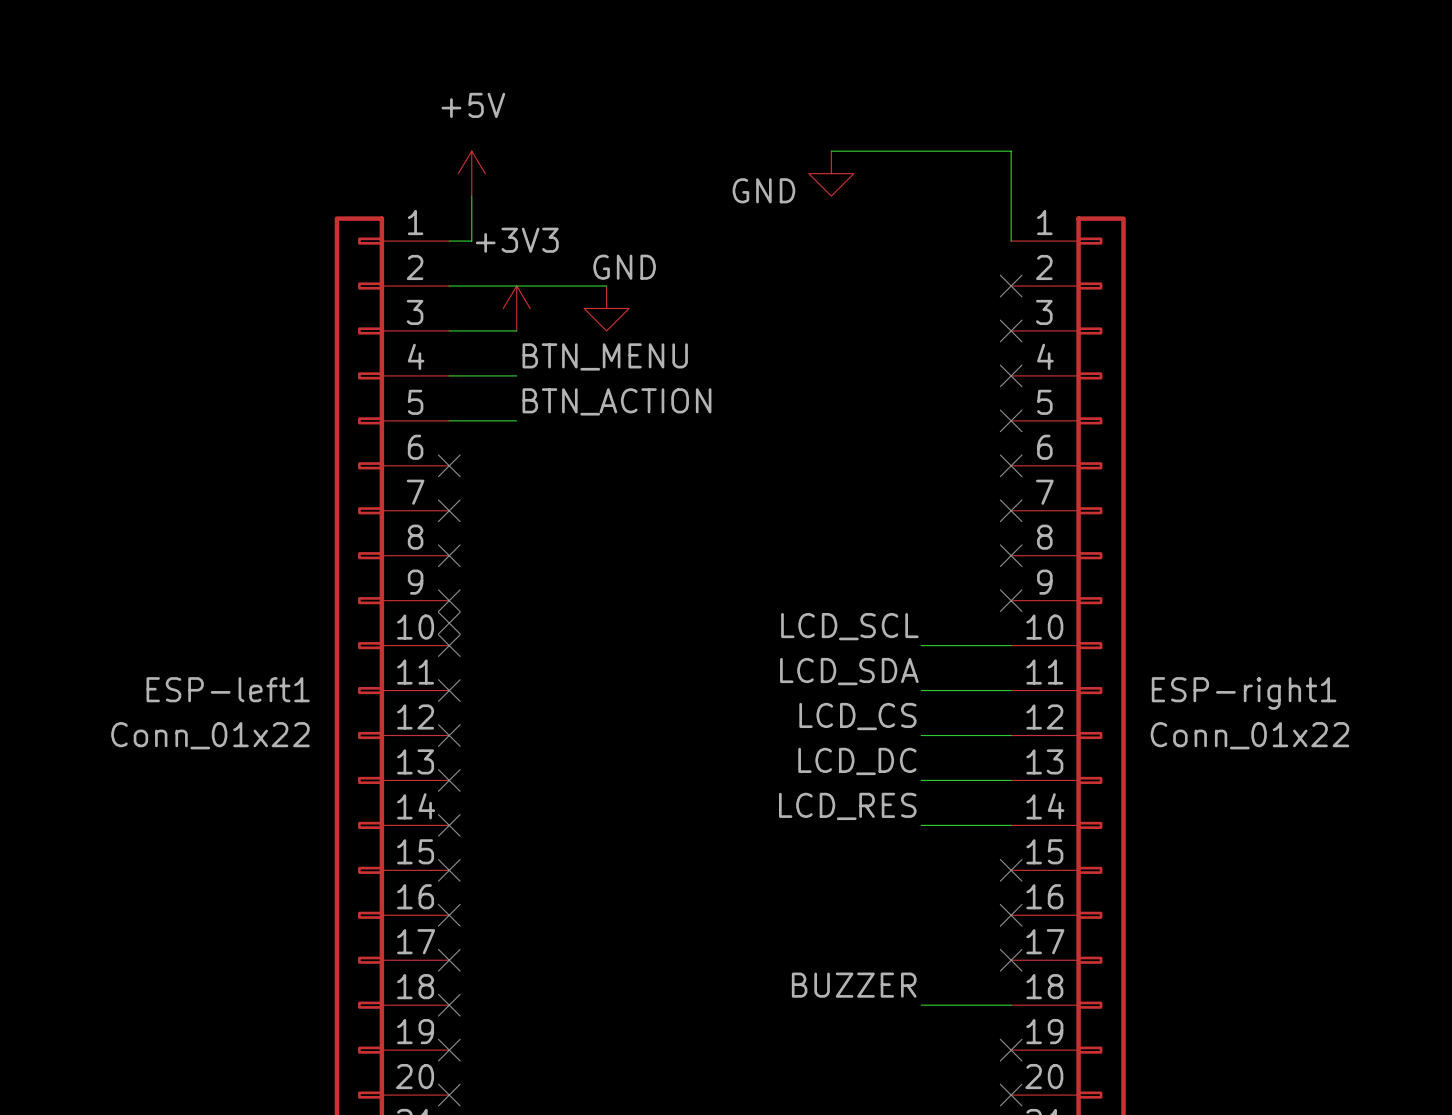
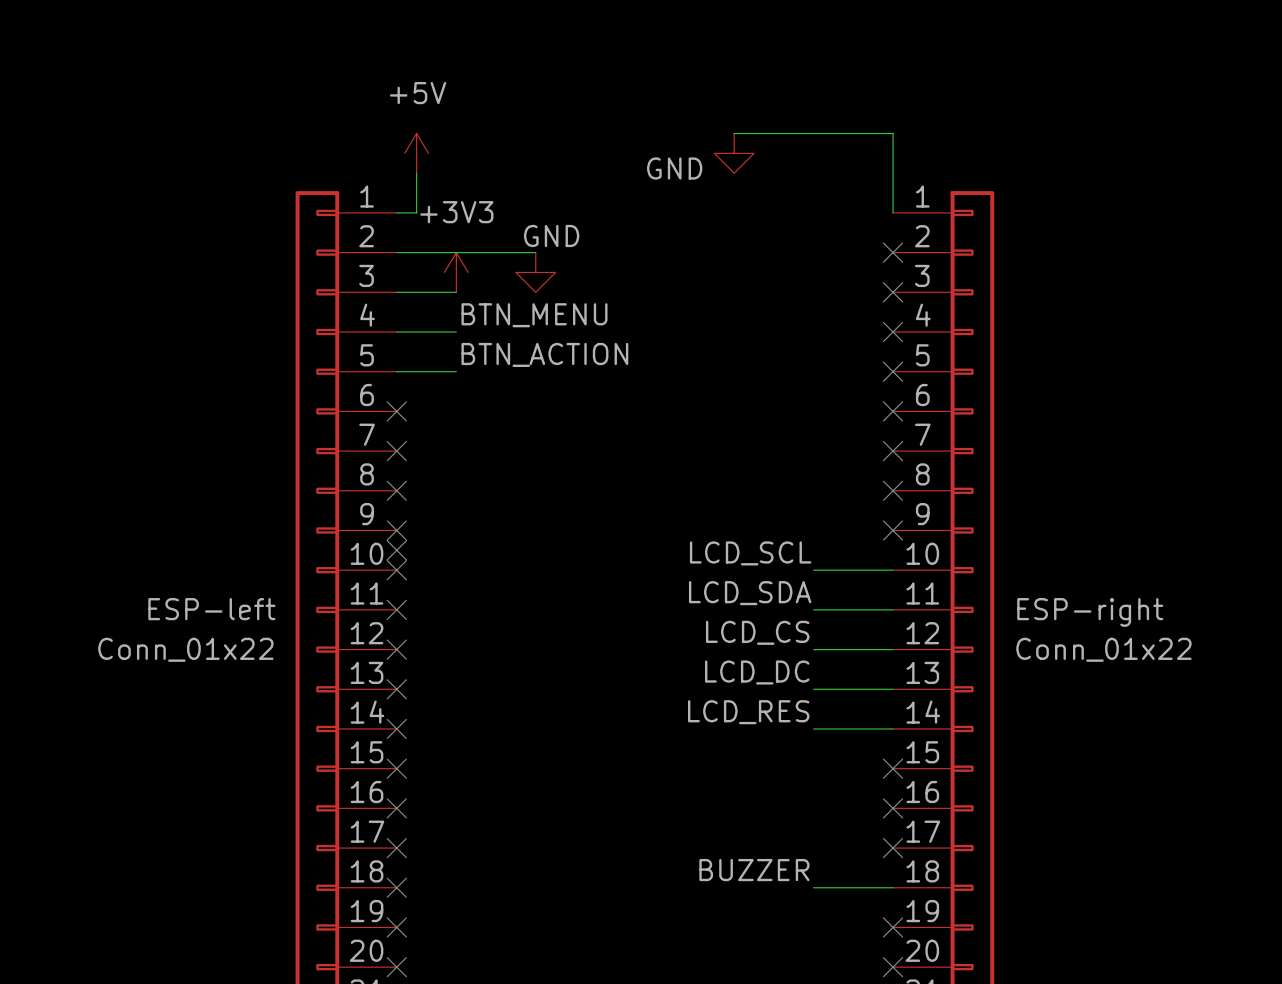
ESP-left1 name: ESP-left1 (228, 689) -> ESP-left (211, 609)
ESP-right1 name: ESP-right1 (1244, 693) -> ESP-right (1090, 612)

